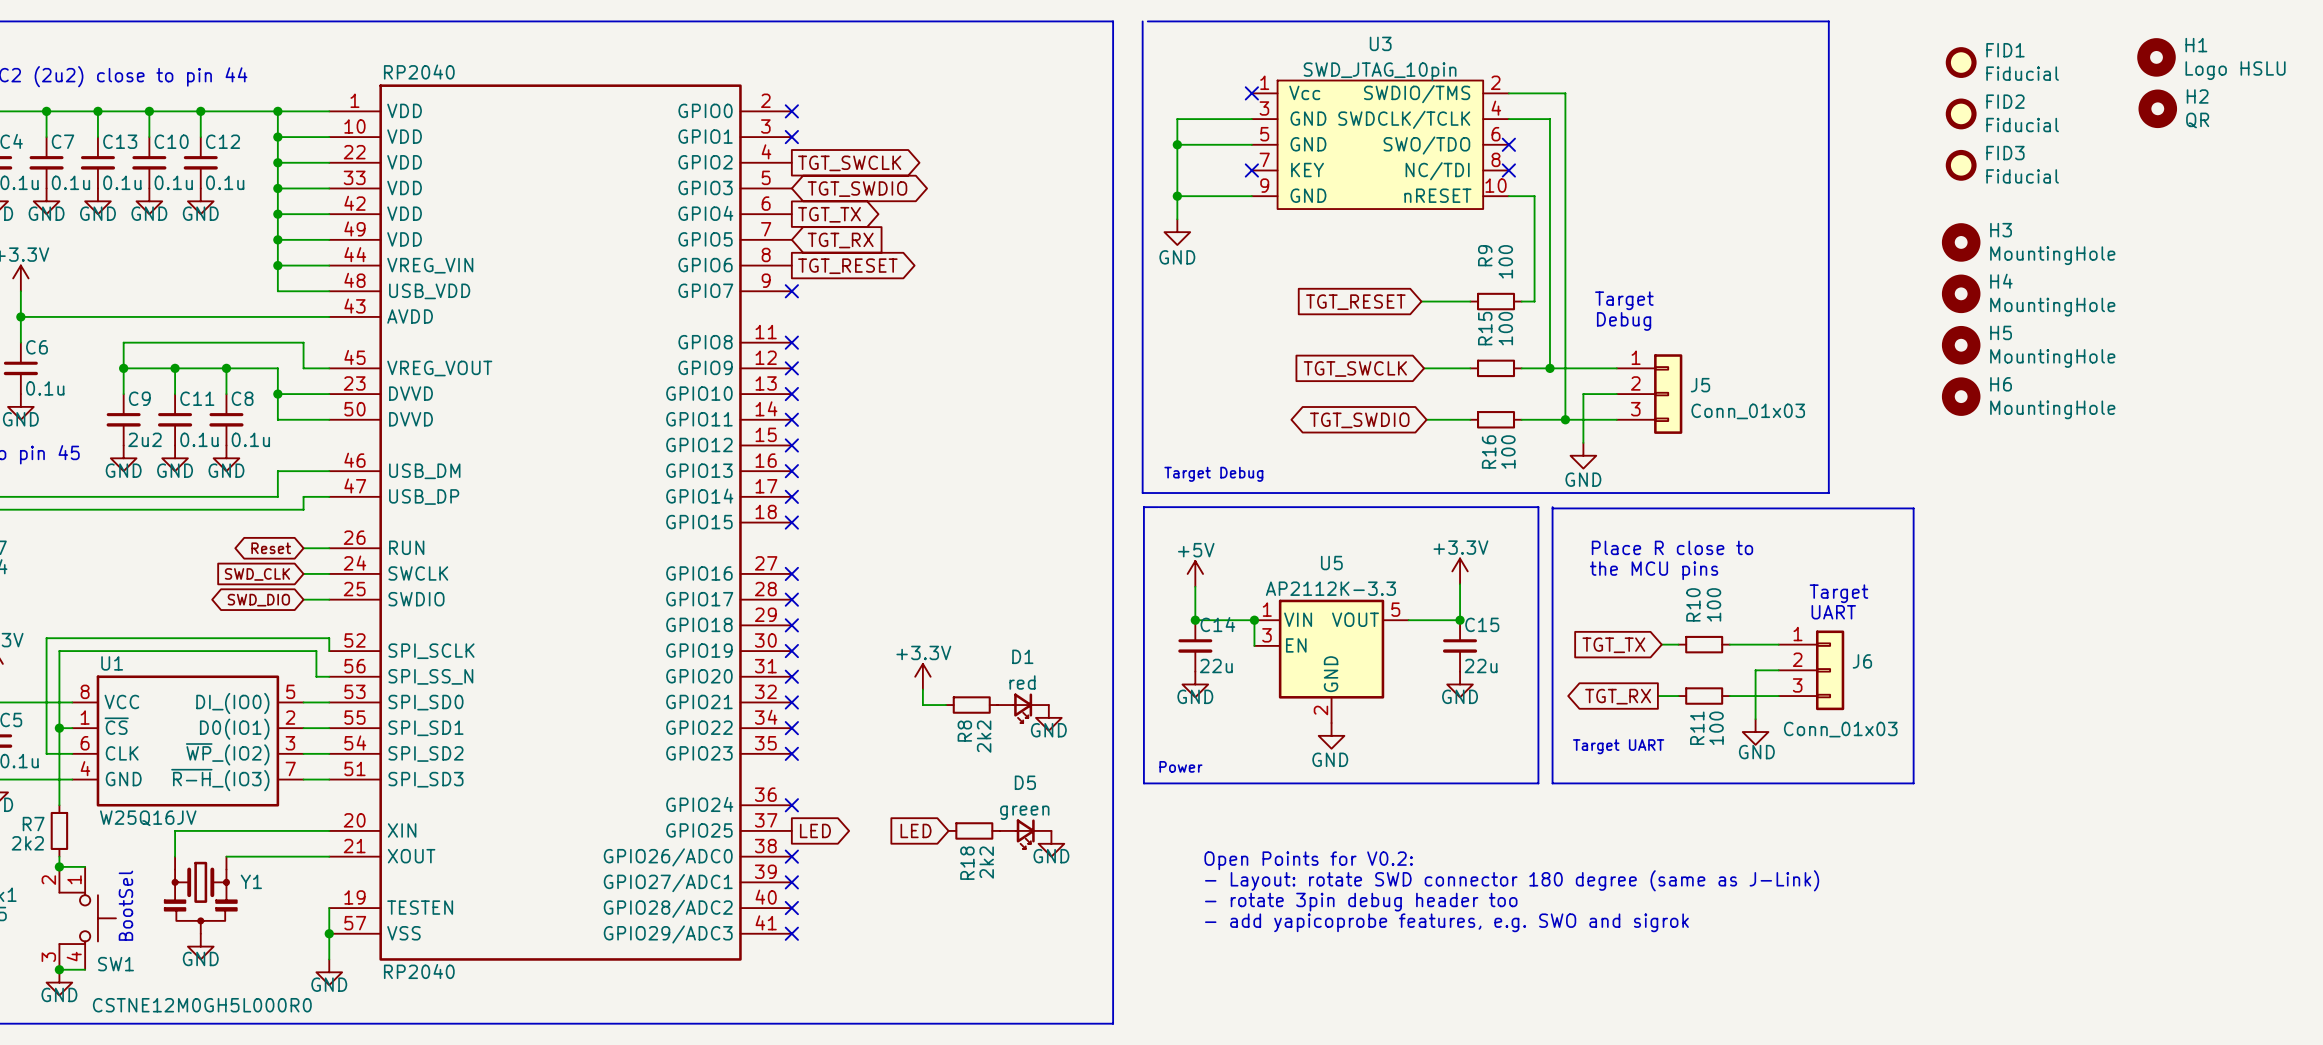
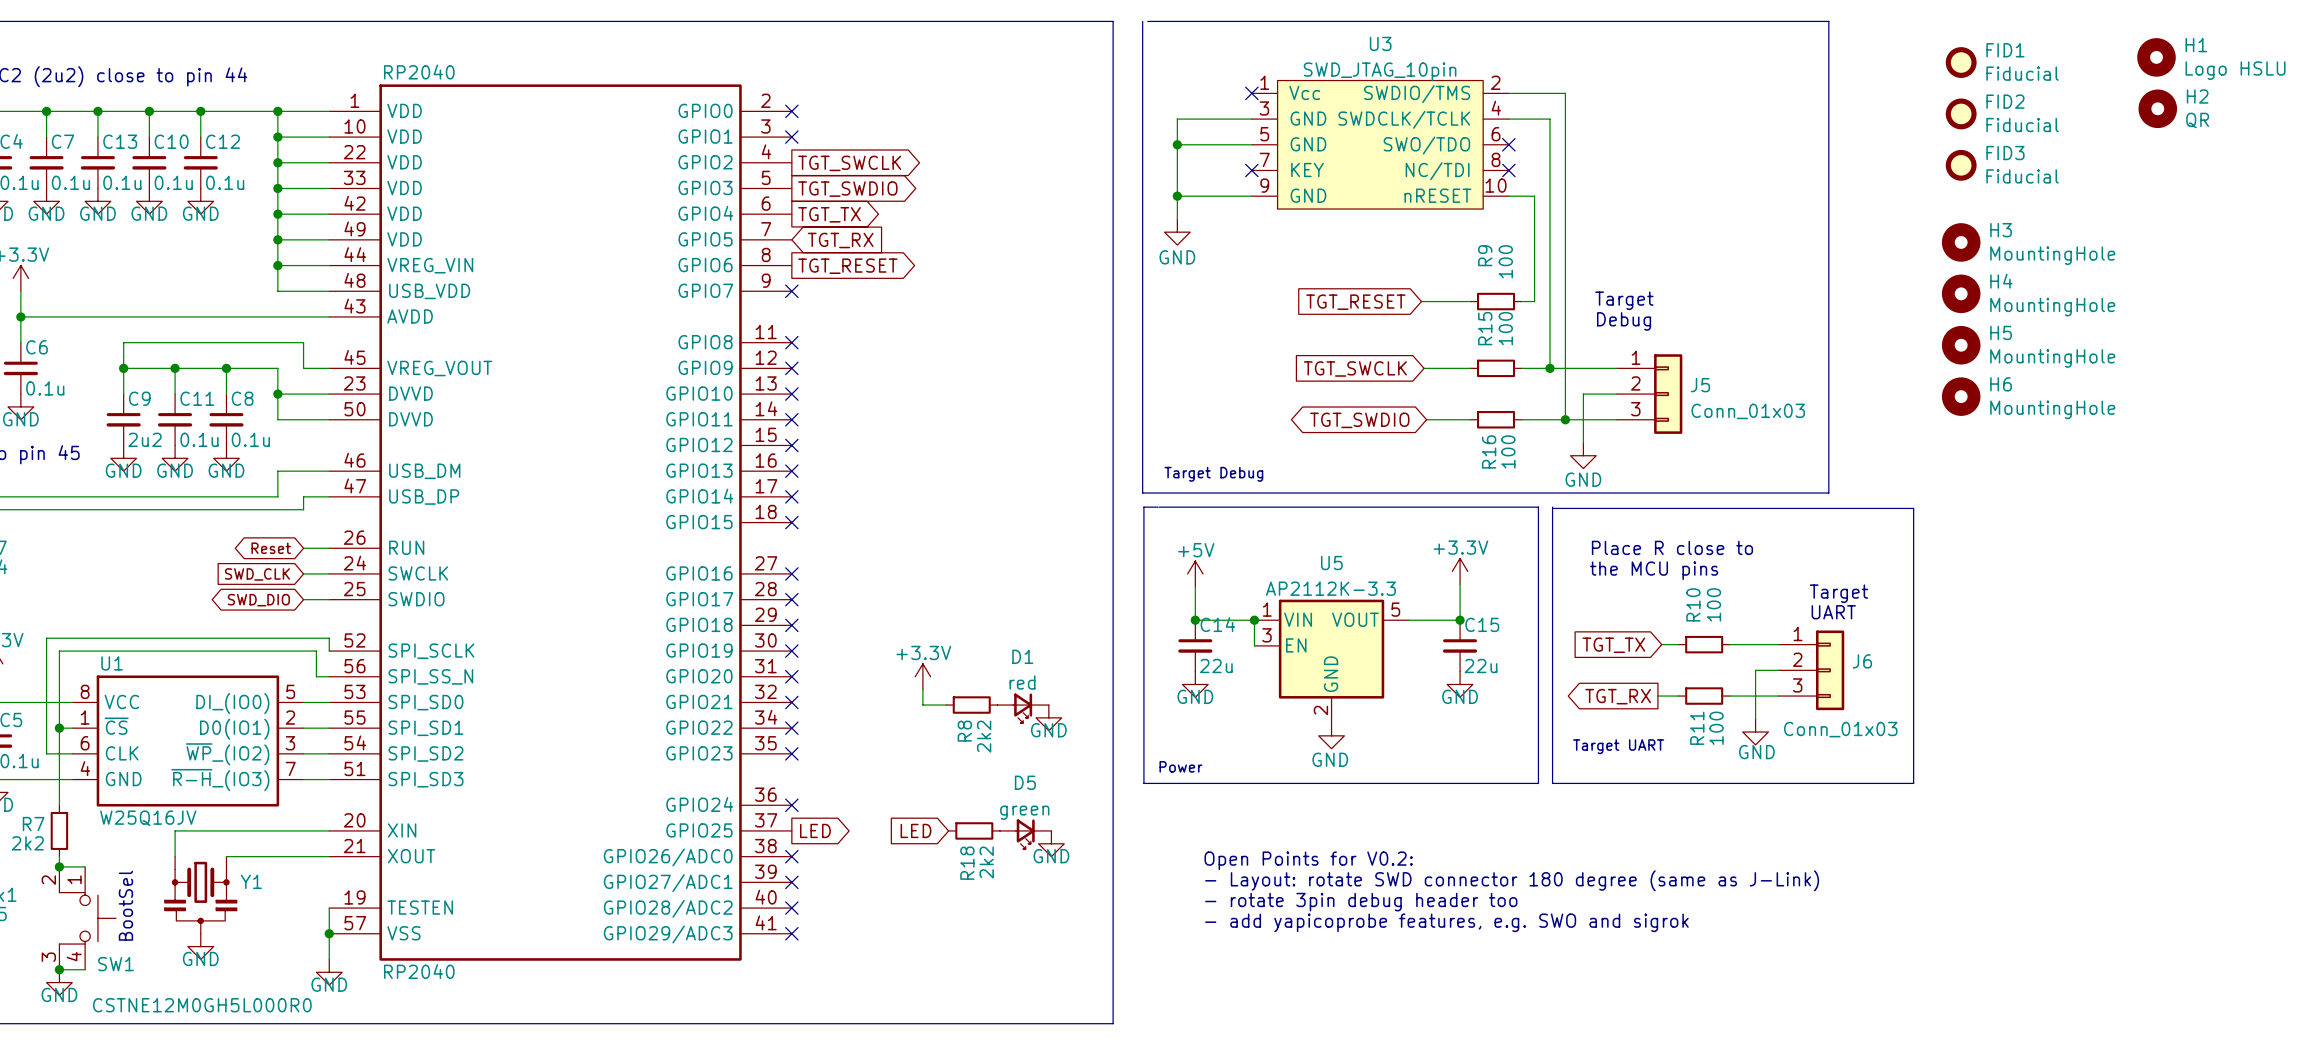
global label shape: bidirectional (857, 189) -> output (847, 189)

